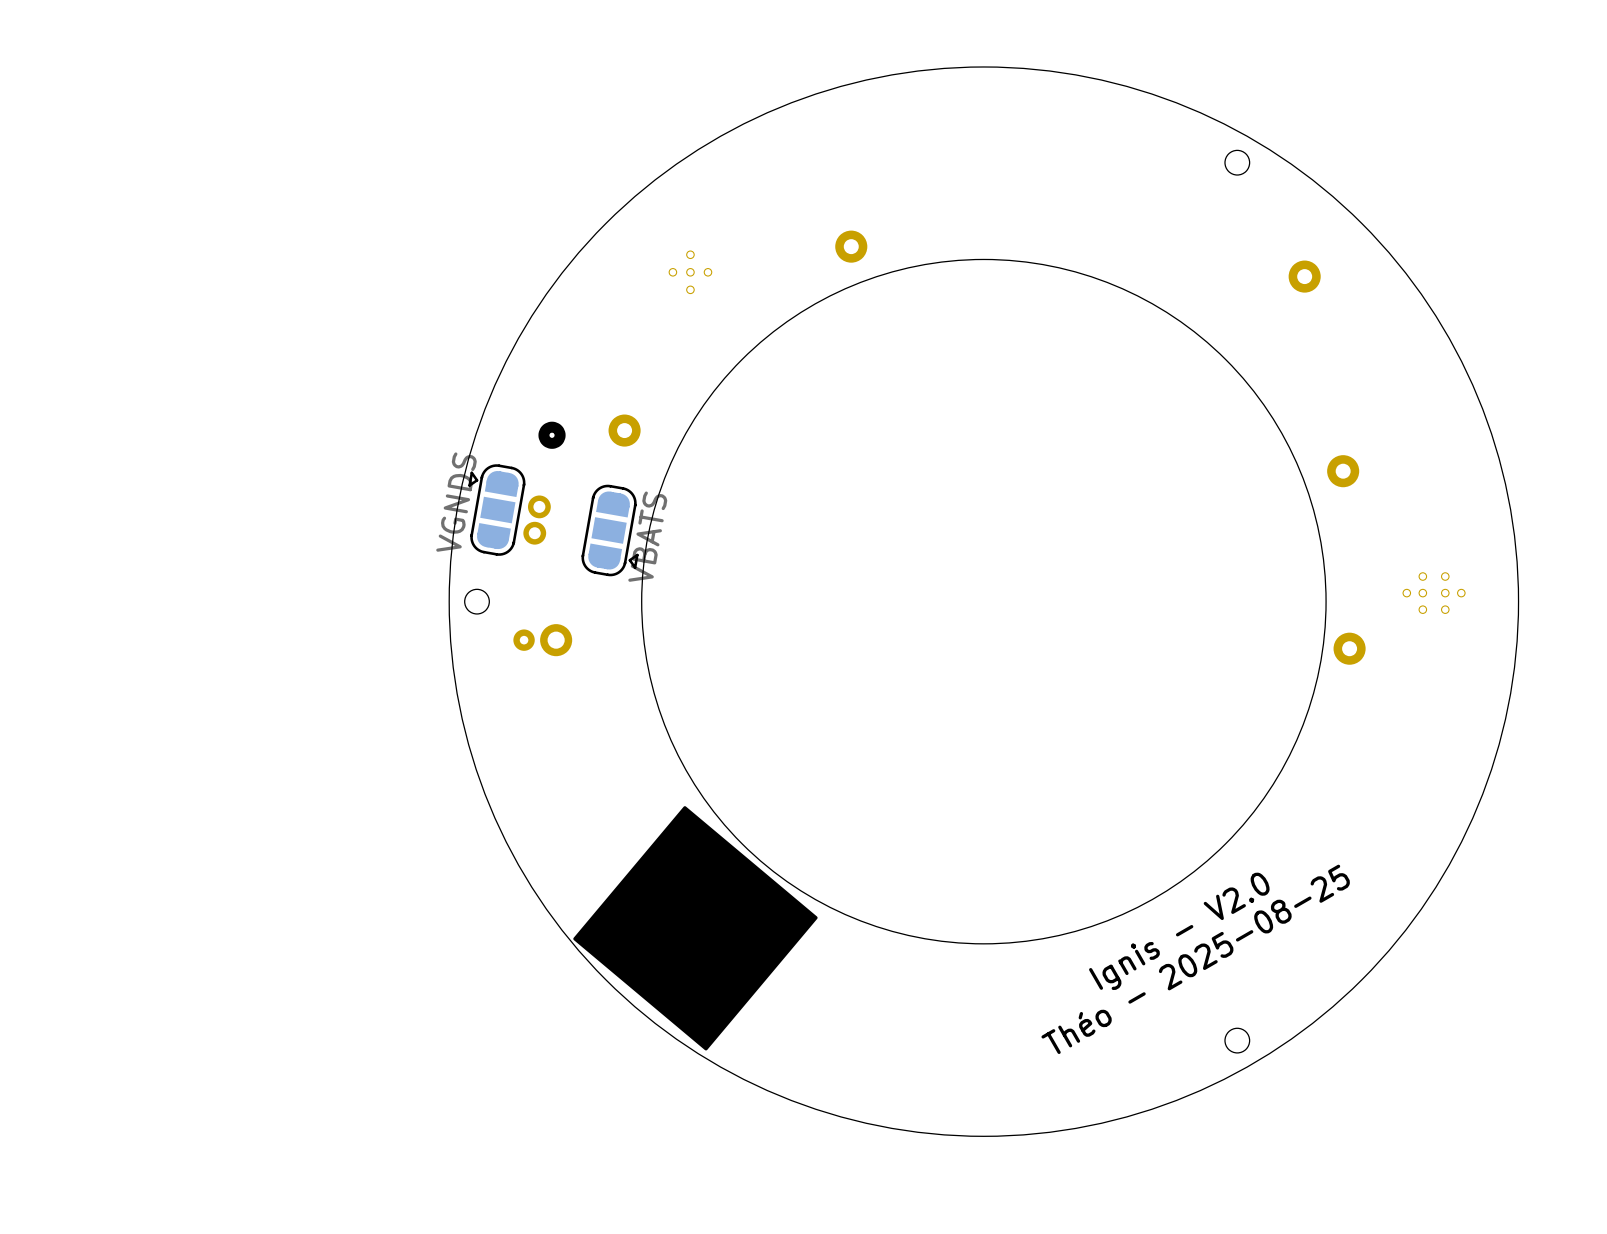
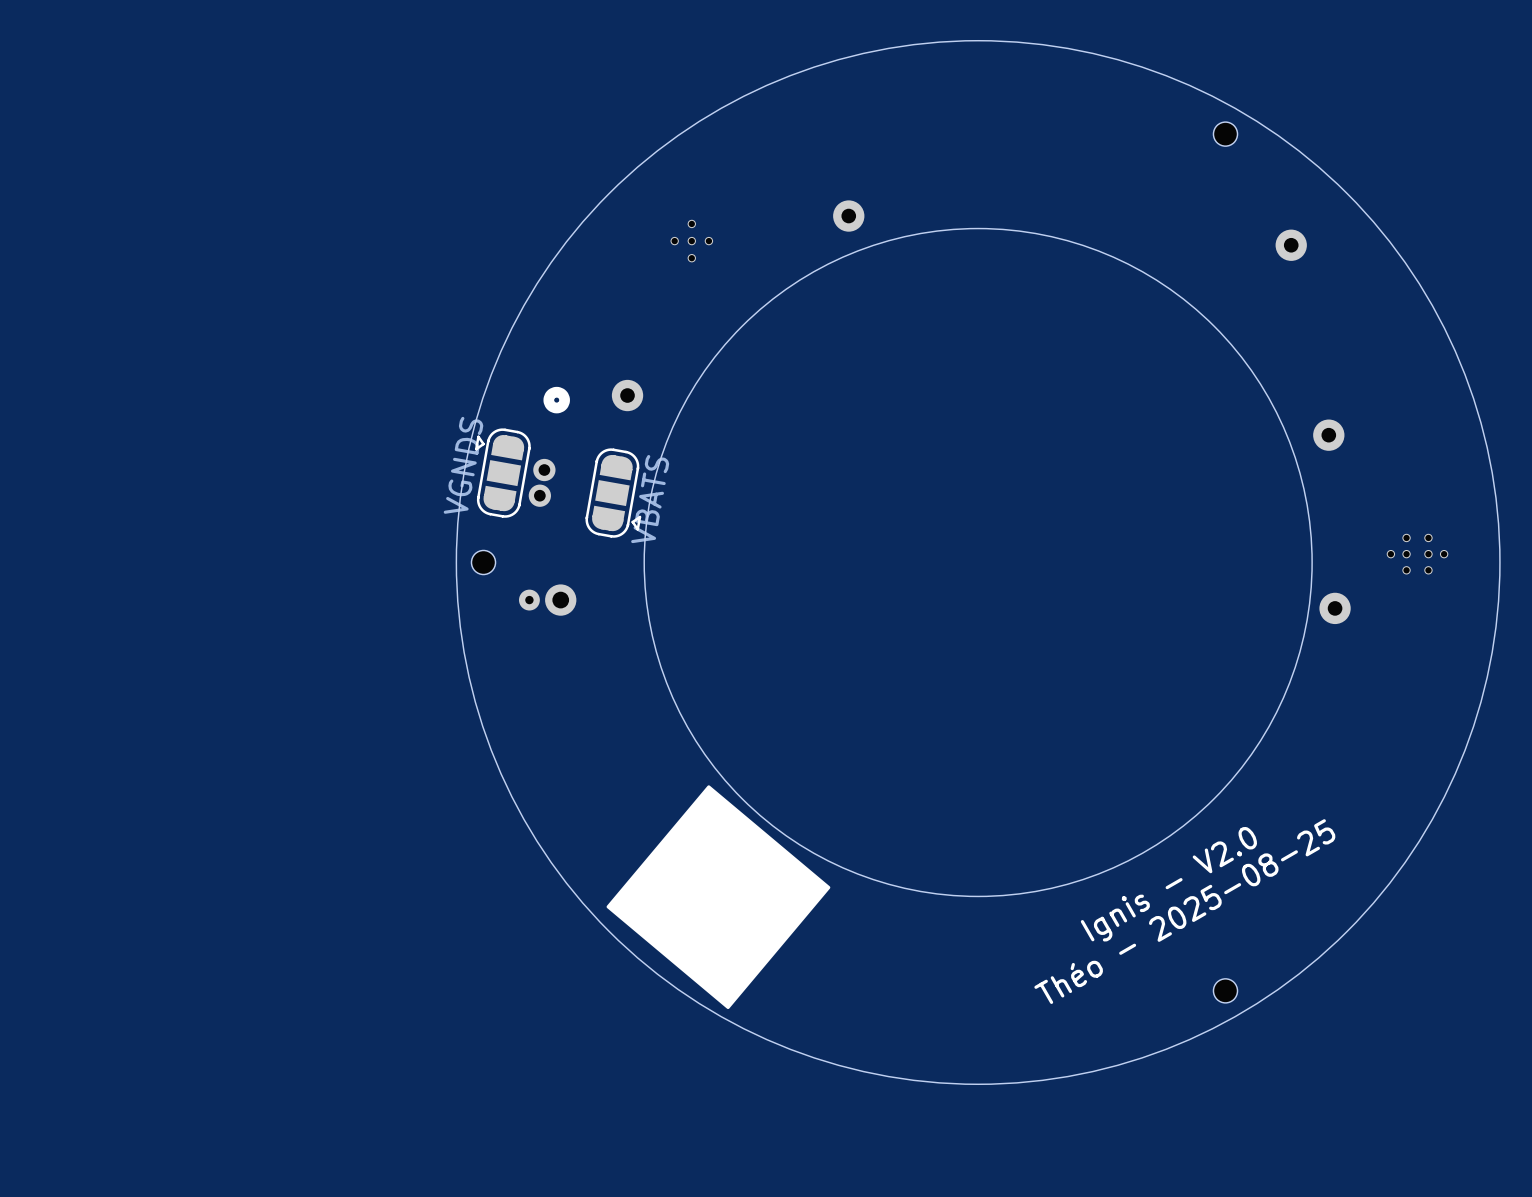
drawing: [573, 806, 818, 1051] -> none
drawing: none -> [606, 785, 831, 1010]

